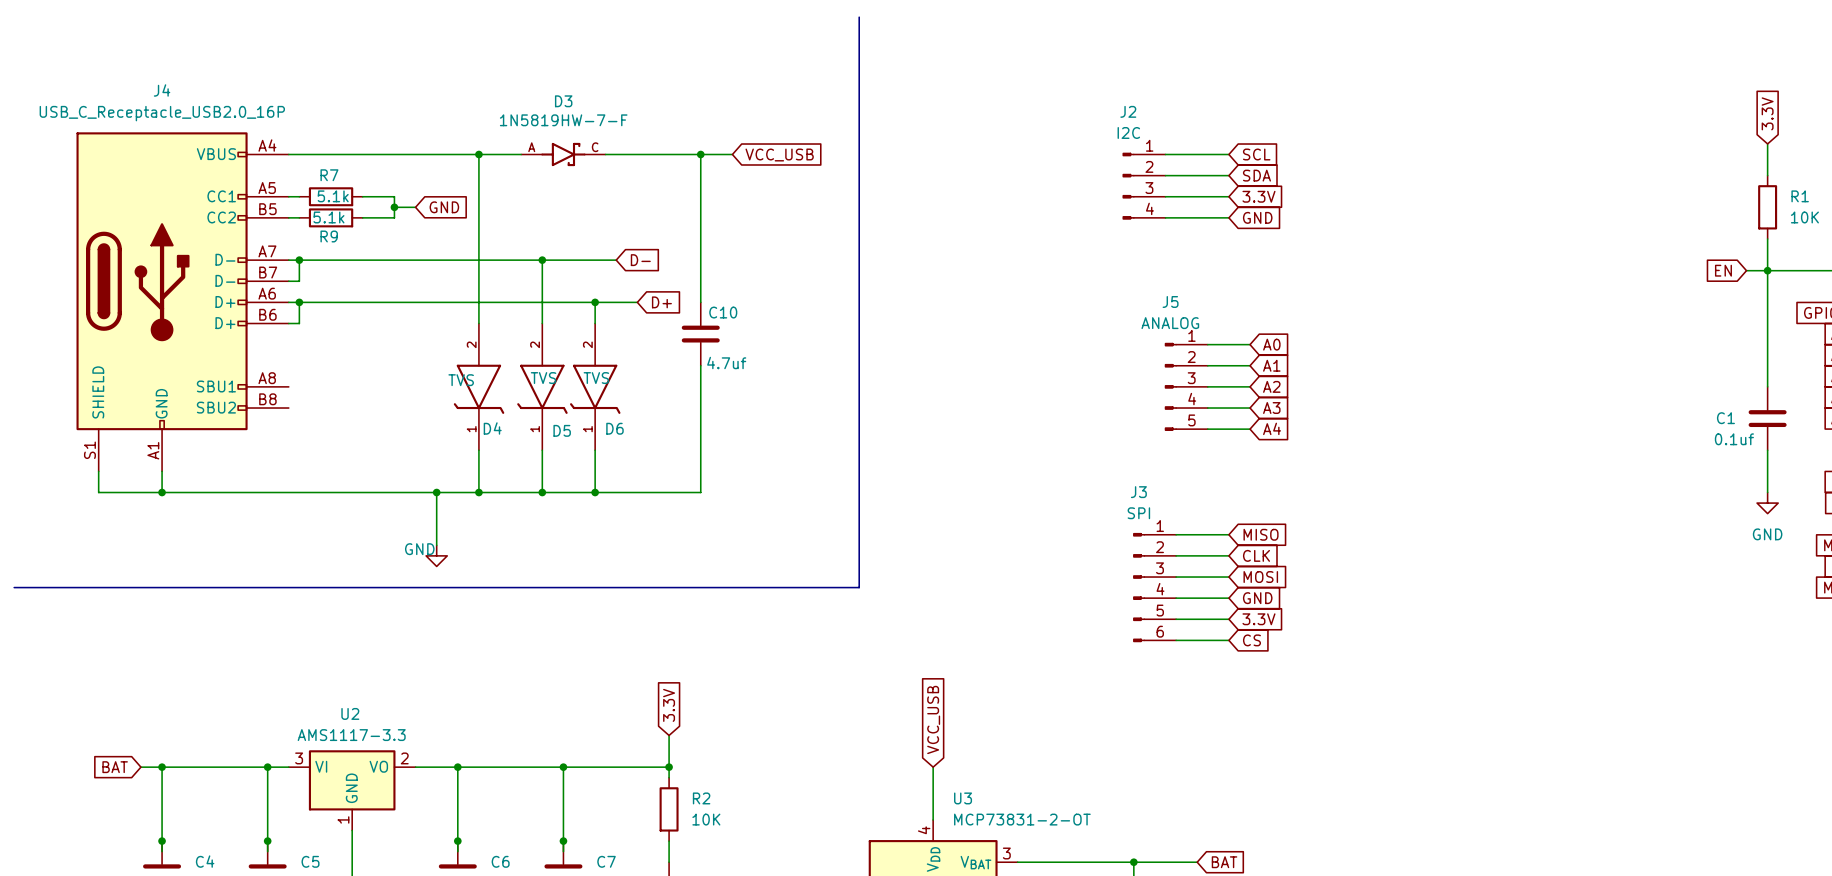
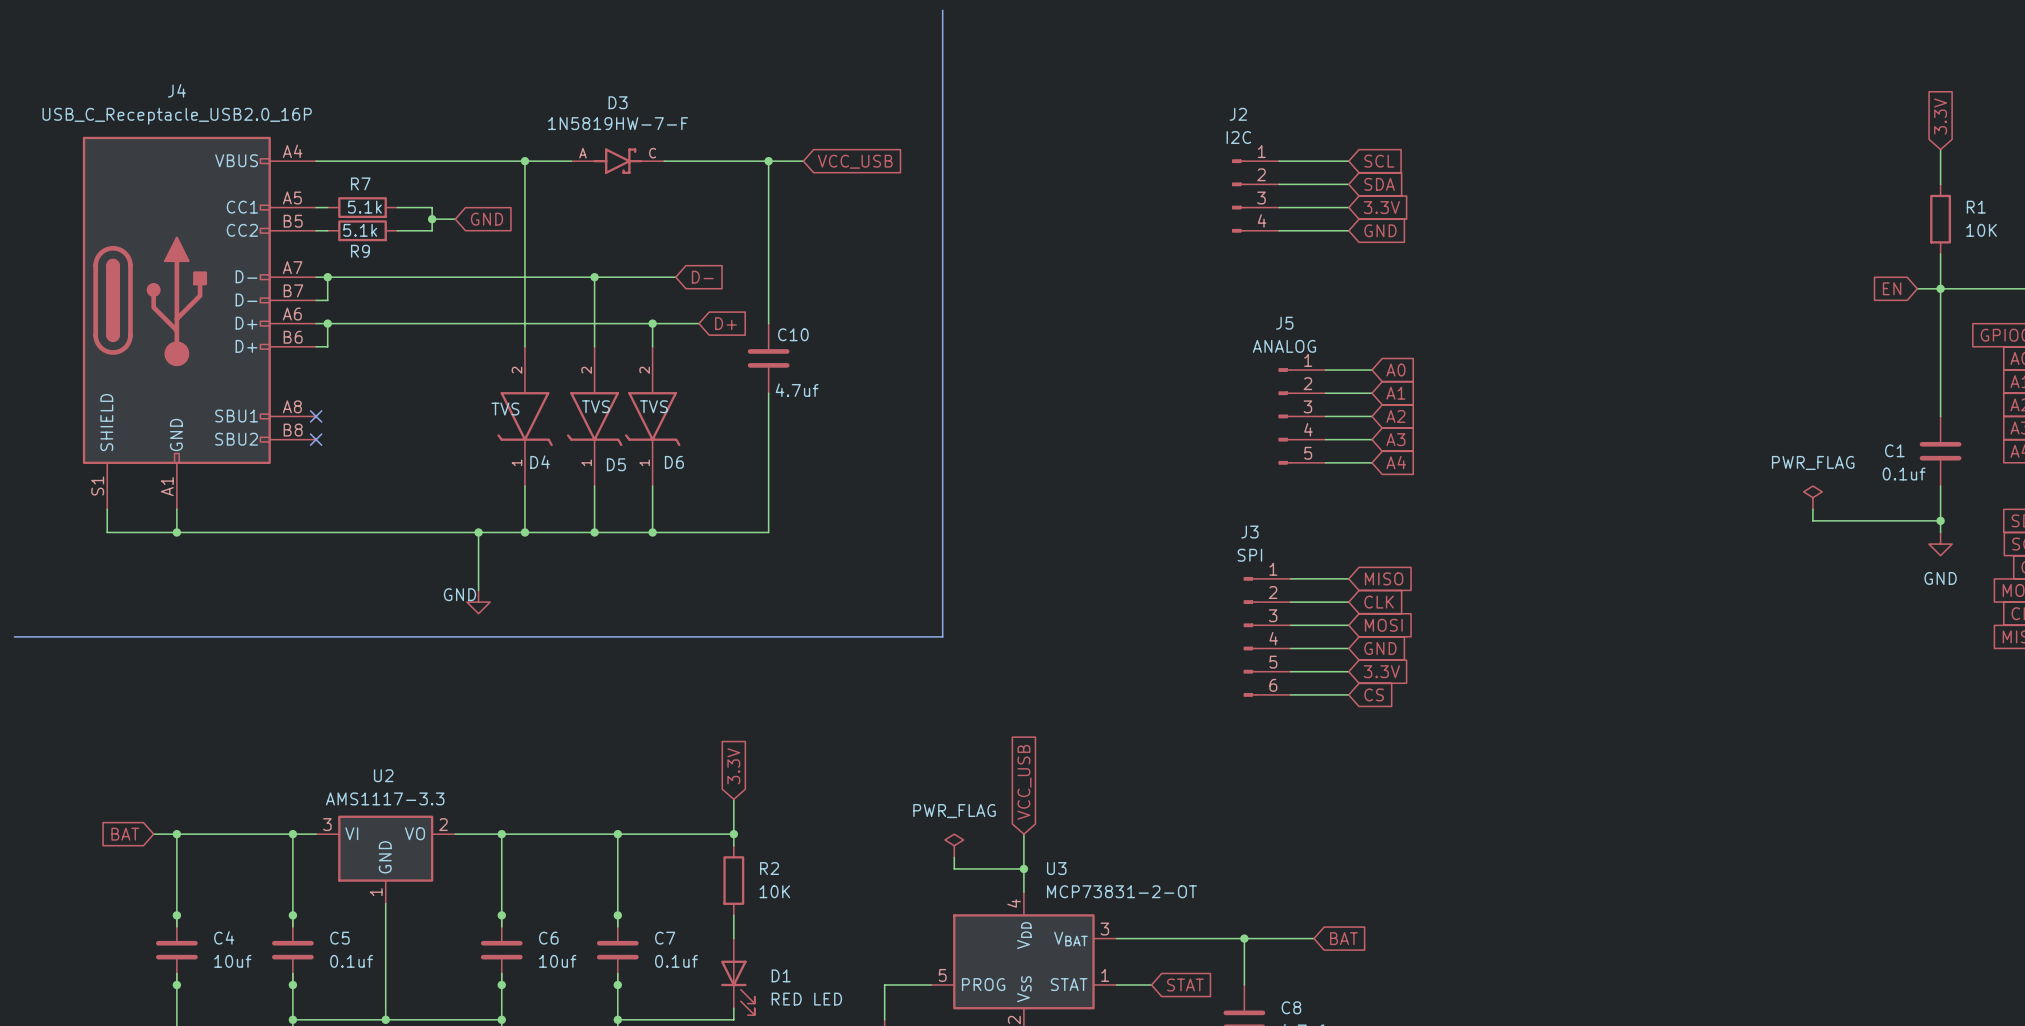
no-connect mark: none -> (316, 416)
no-connect mark: none -> (316, 439)
power symbol: none -> PWR_FLAG (1812, 497)
wire: none -> (1812, 509) (1812, 520) (1940, 520)
junction: none -> (1940, 520)
power symbol: none -> PWR_FLAG (954, 845)
wire: none -> (954, 857) (954, 868) (1023, 868)
junction: none -> (1023, 868)

